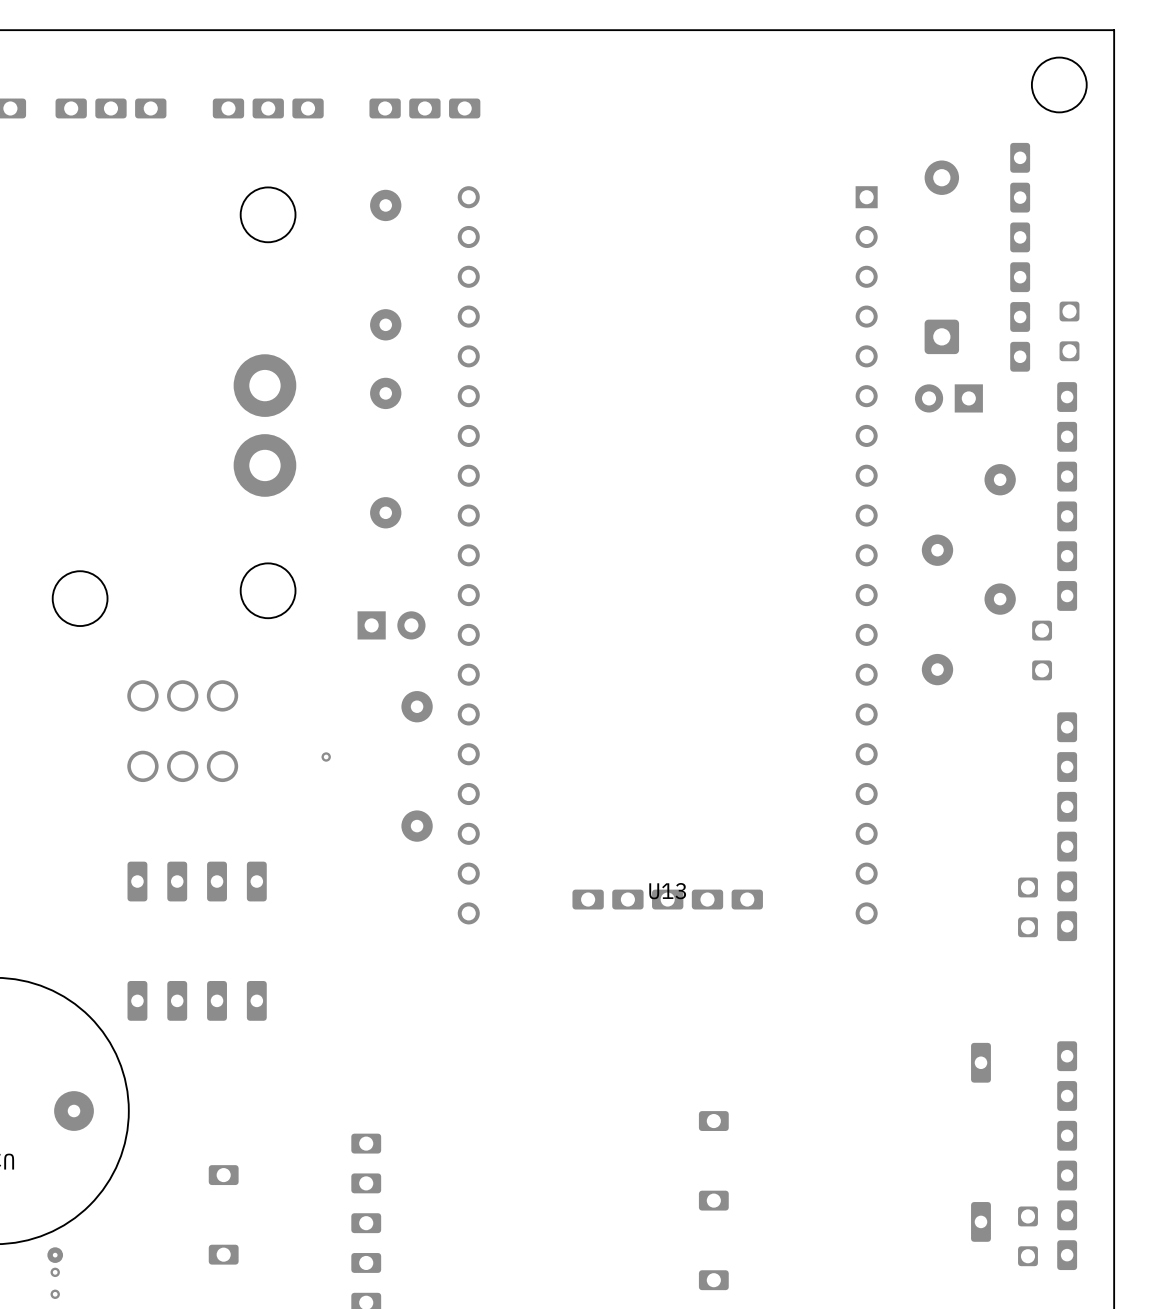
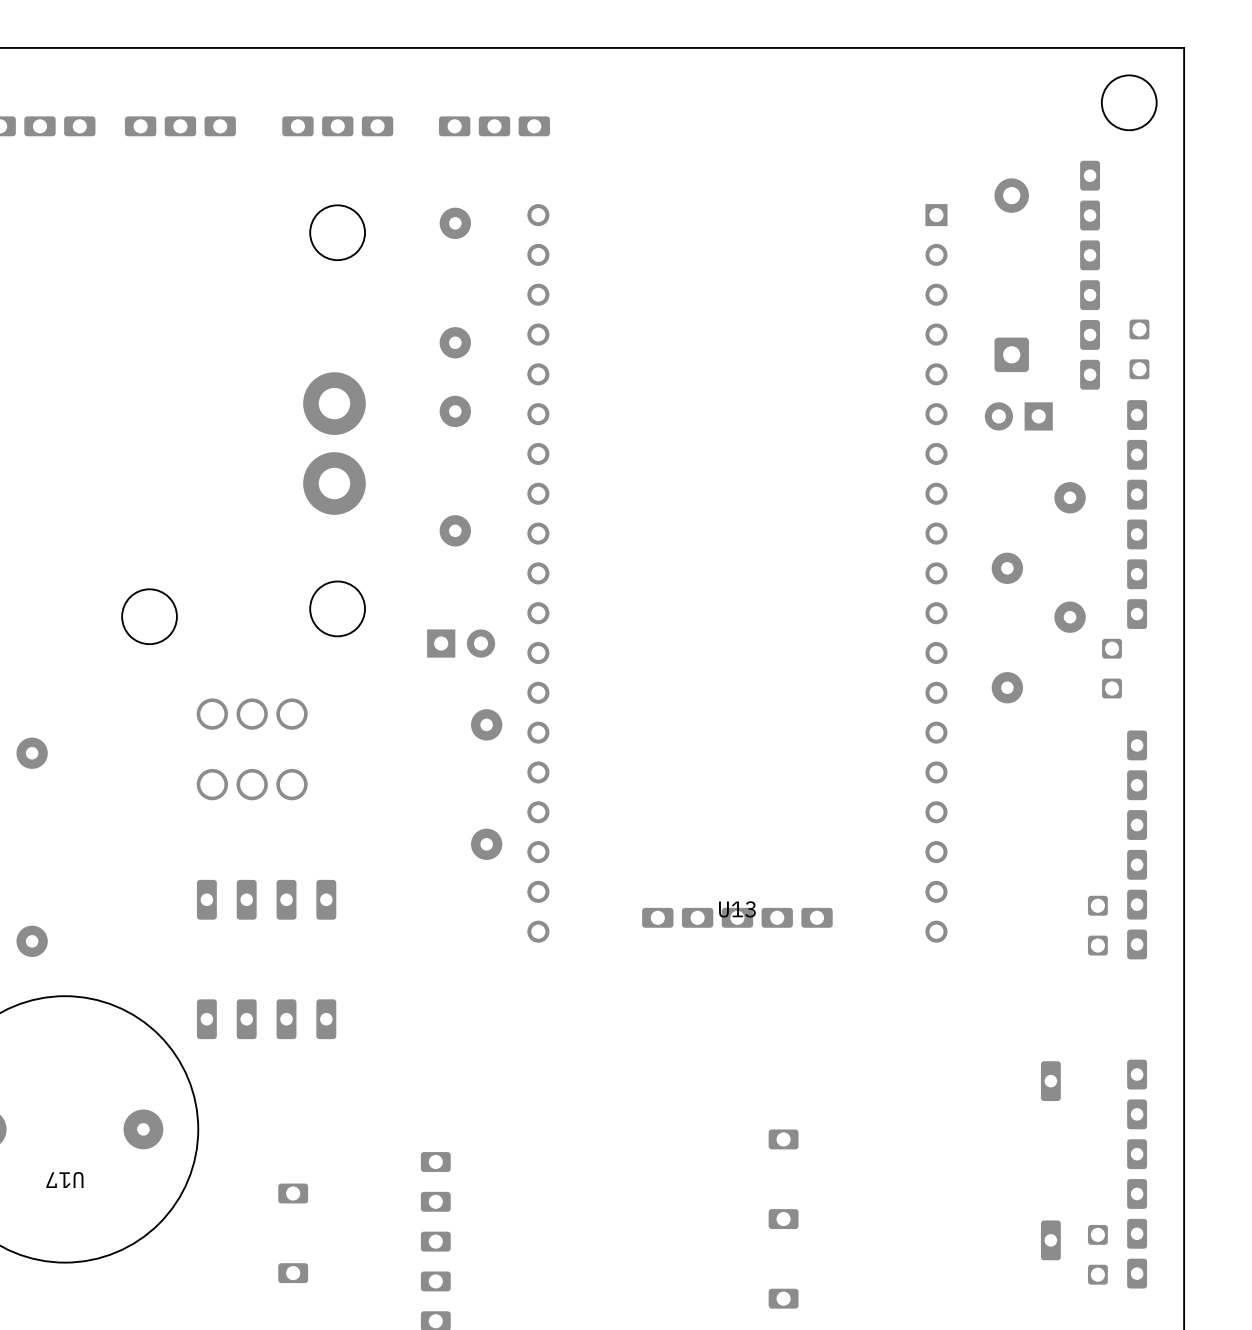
via: (326, 756) -> none
via: (55, 1255) -> none
via: (55, 1272) -> none
via: (55, 1294) -> none

